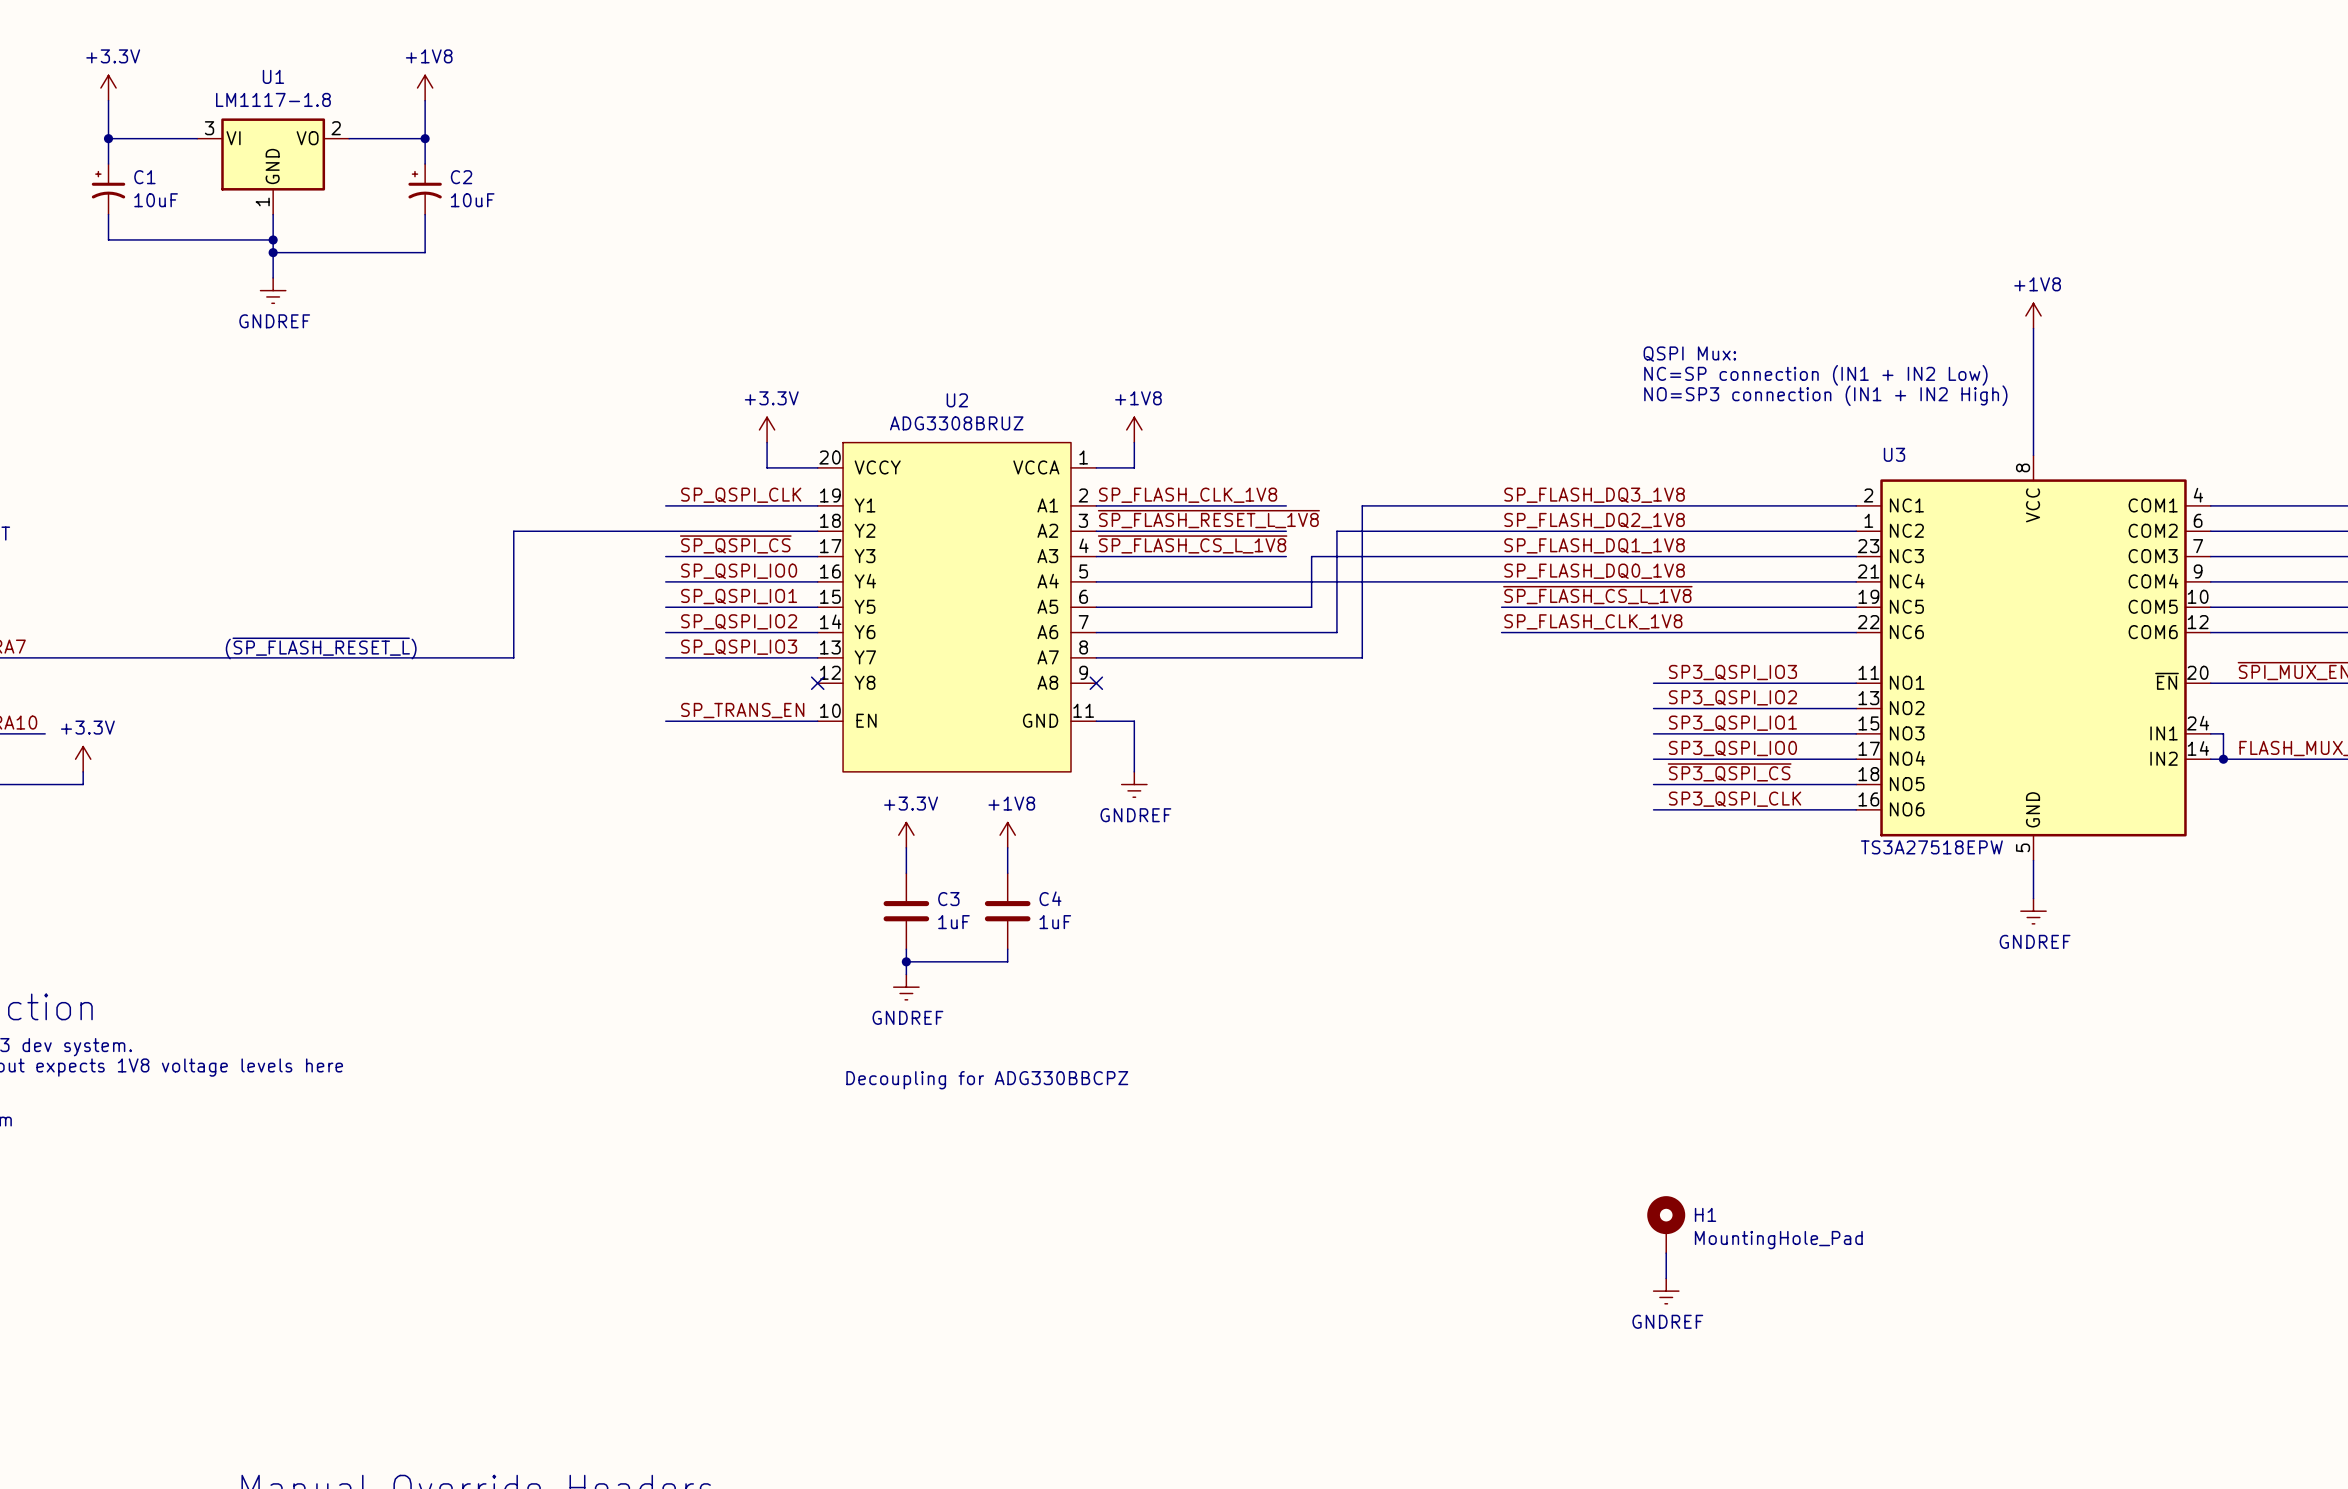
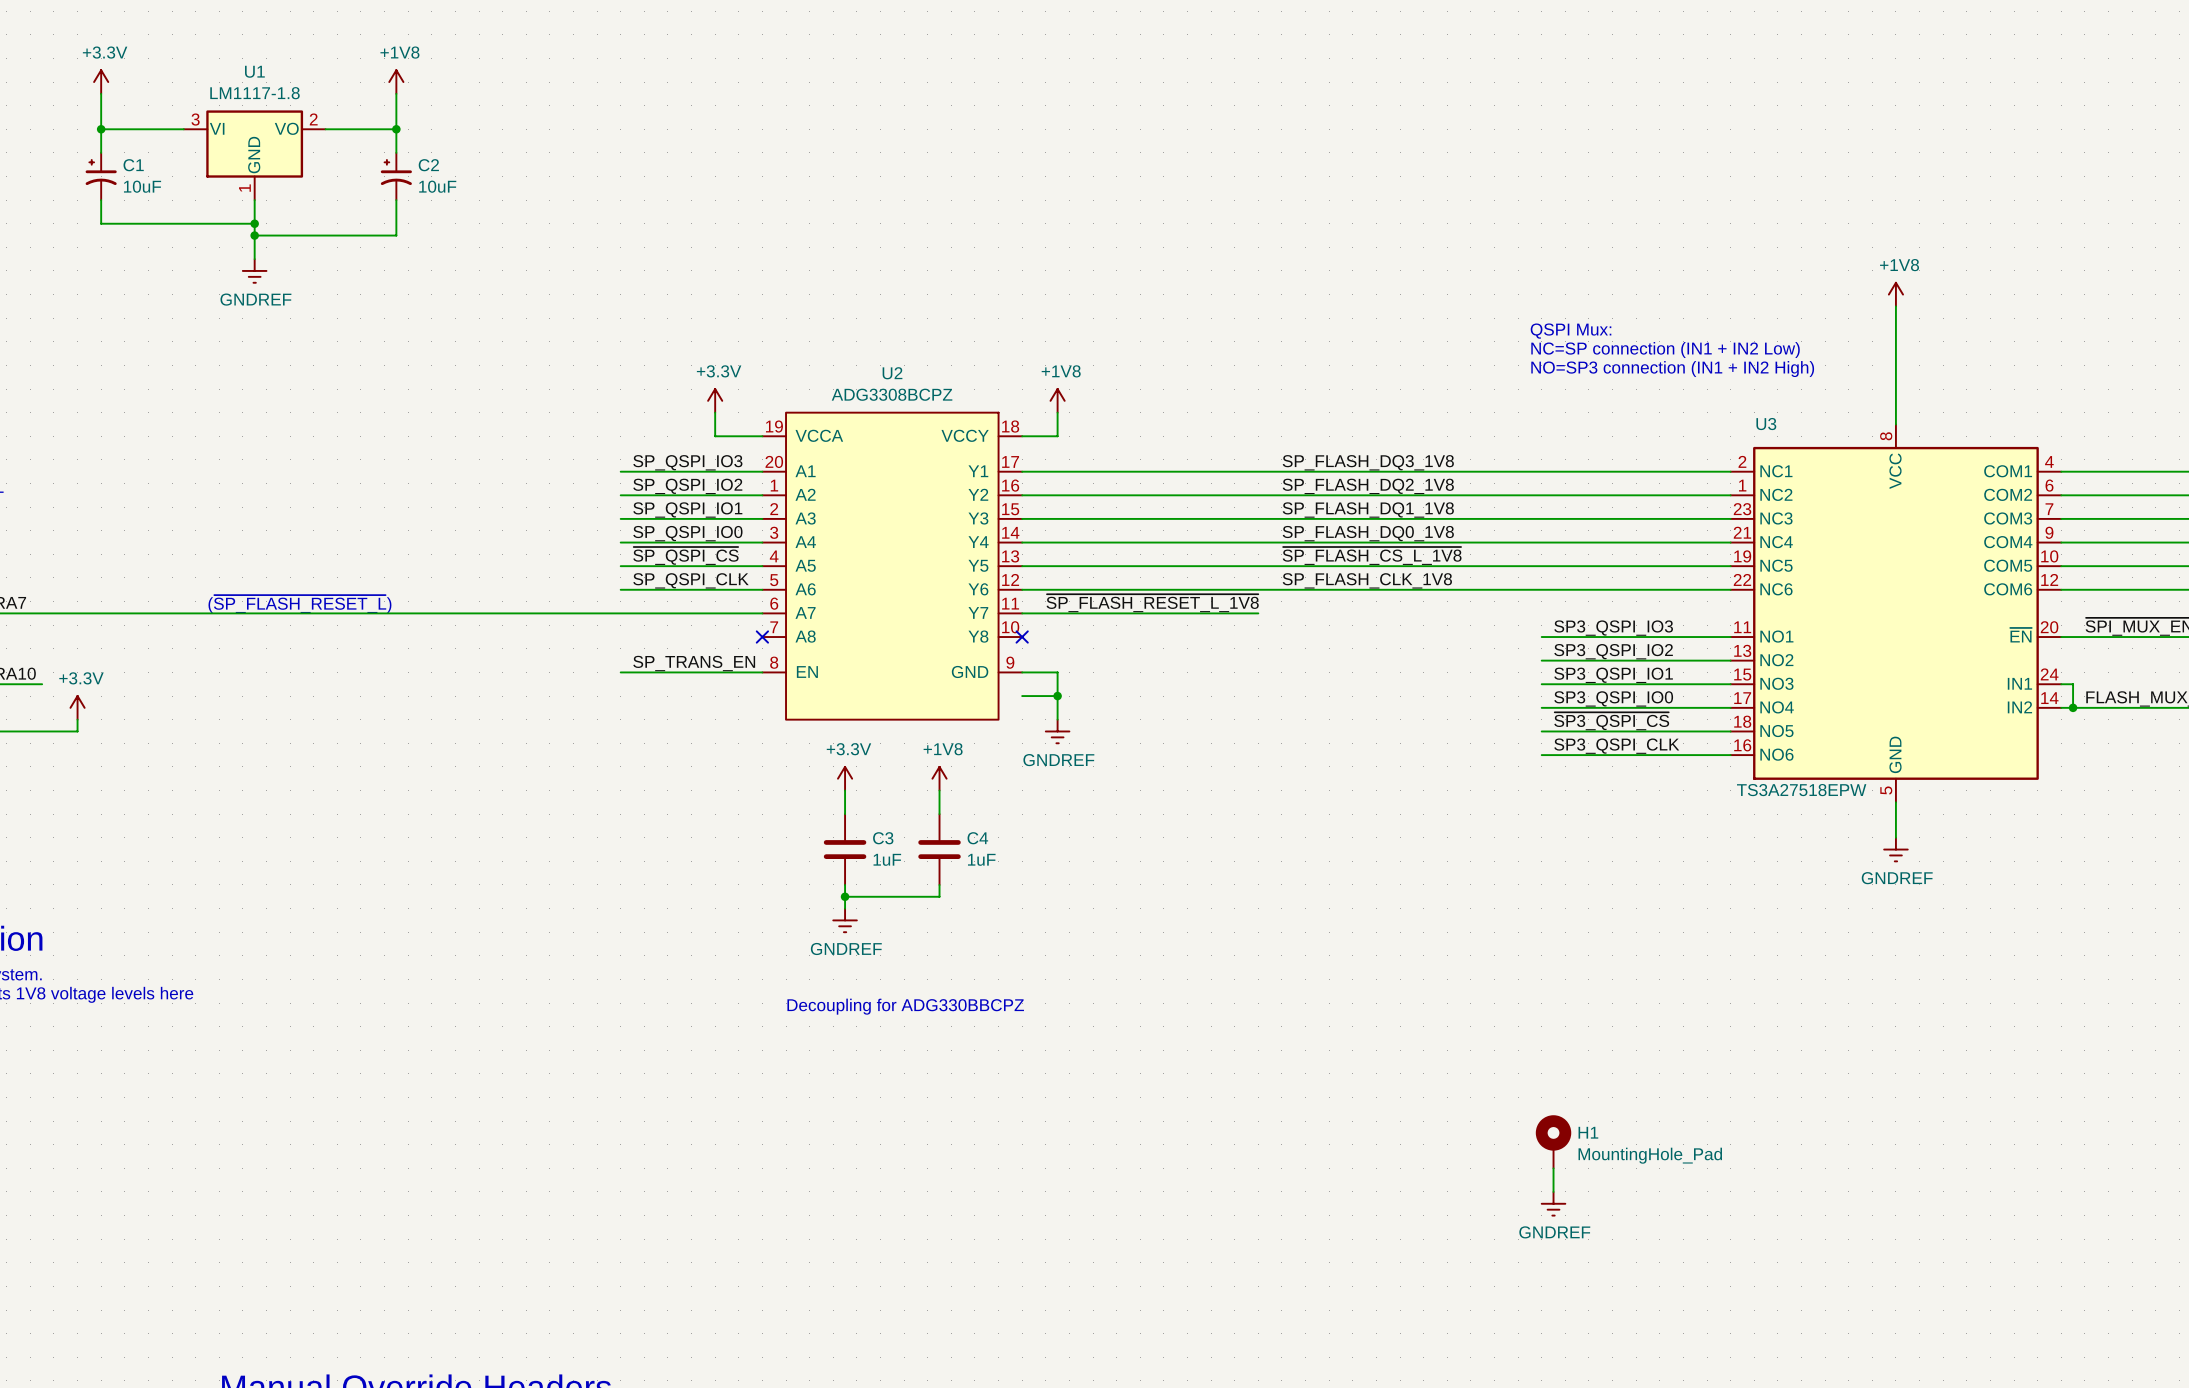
U2 value: ADG3308BRUZ (956, 423) -> ADG3308BCPZ (892, 394)
U2 symbol: [817, 442, 1097, 772] -> [762, 412, 1023, 720]
label: SP_QSPI_CLK (741, 495) -> SP_QSPI_IO3 (687, 462)
label: SP_FLASH_CLK_1V8 (1188, 495) -> none
label position: SP_FLASH_DQ3_1V8 (1594, 495) -> SP_FLASH_DQ3_1V8 (1368, 462)
wire: (1362, 505) (1362, 657) (1349, 657) -> (1270, 471) (1199, 471)
label position: ~{SP_FLASH_RESET_L_1V8} (1208, 519) -> ~{SP_FLASH_RESET_L_1V8} (1152, 603)
label: none -> SP_QSPI_IO2 (687, 486)
label position: SP_FLASH_DQ2_1V8 (1594, 520) -> SP_FLASH_DQ2_1V8 (1368, 486)
wire: (665, 531) (513, 531) (513, 657) -> (620, 613) (479, 613)
wire: (1336, 531) (1336, 632) -> (1246, 495) (1199, 495)
label: ~{SP_QSPI_CS} (735, 544) -> SP_QSPI_IO1 (687, 510)
label: ~{SP_FLASH_CS_L_1V8} (1192, 544) -> none
label position: SP_FLASH_DQ1_1V8 (1594, 545) -> SP_FLASH_DQ1_1V8 (1368, 510)
wire: (1311, 556) (1311, 607) -> (1222, 518) (1199, 518)
label position: SP_FLASH_DQ0_1V8 (1594, 571) -> SP_FLASH_DQ0_1V8 (1368, 533)
label position: ~{SP_FLASH_CS_L_1V8} (1597, 595) -> ~{SP_FLASH_CS_L_1V8} (1372, 555)
label: SP_QSPI_IO1 (739, 596) -> ~{SP_QSPI_CS} (685, 555)
wire: none -> (1222, 566) (1400, 566)
label: SP_QSPI_IO2 (739, 621) -> SP_QSPI_CLK (691, 580)
label position: SP_FLASH_CLK_1V8 (1593, 621) -> SP_FLASH_CLK_1V8 (1367, 580)
wire: none -> (1246, 589) (1400, 589)
label: SP_QSPI_IO3 (739, 647) -> none
wire: none -> (1022, 696) (1057, 696)
junction: none -> (1057, 696)

